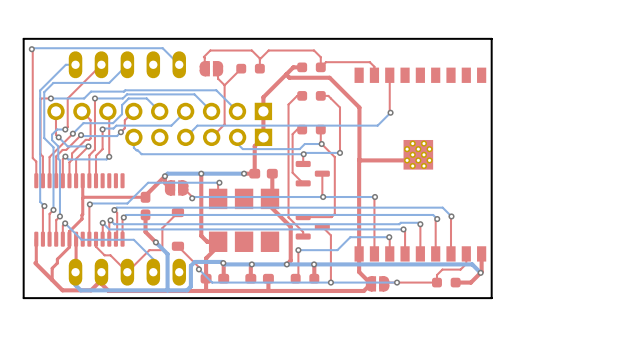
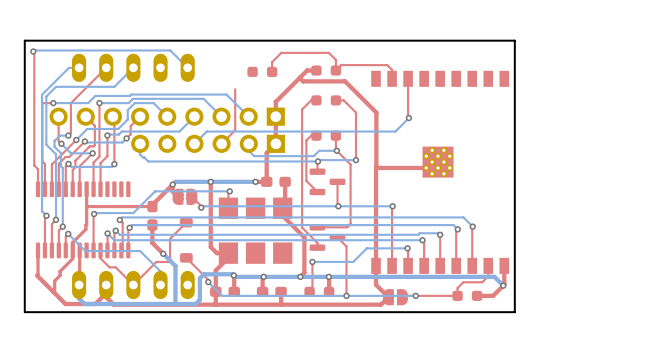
top track: (259, 59) (251, 50) (210, 50) (203, 56) (204, 68) -> none
part: (211, 68) -> none
top track: (241, 68) (224, 85) (218, 78) (218, 68) -> none

